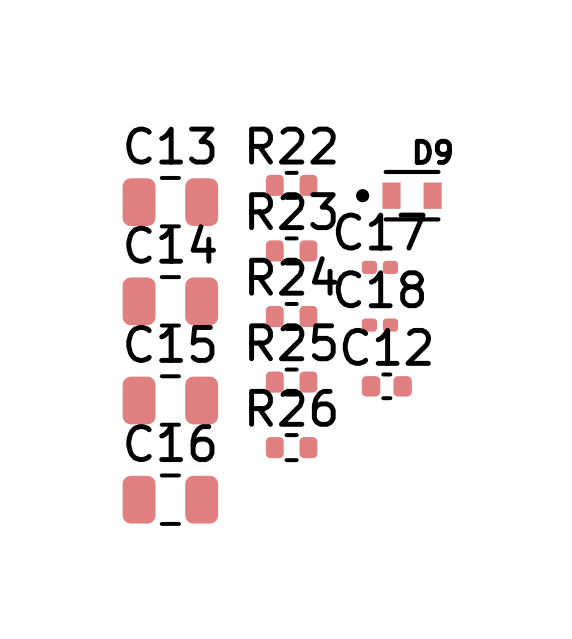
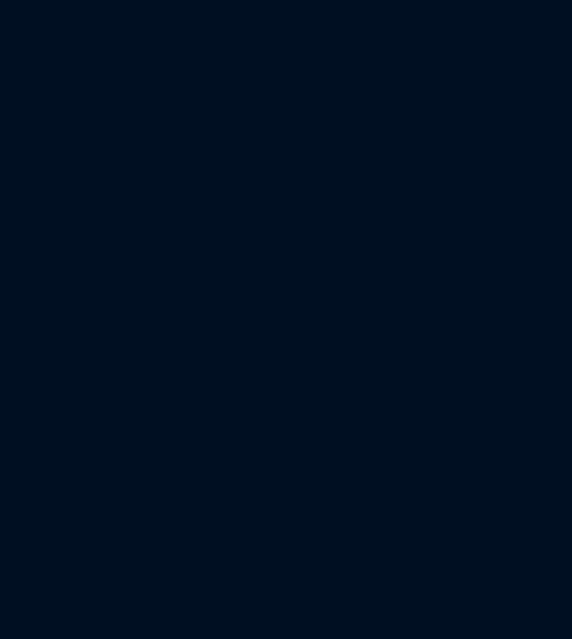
R22: (291, 185) -> none
D9: (398, 195) -> none
C13: (170, 202) -> none
R23: (291, 250) -> none
C17: (379, 267) -> none
C14: (170, 301) -> none
R24: (291, 316) -> none
C18: (379, 325) -> none
R25: (291, 382) -> none
C12: (386, 386) -> none
C15: (170, 400) -> none
R26: (291, 447) -> none
C16: (170, 499) -> none

